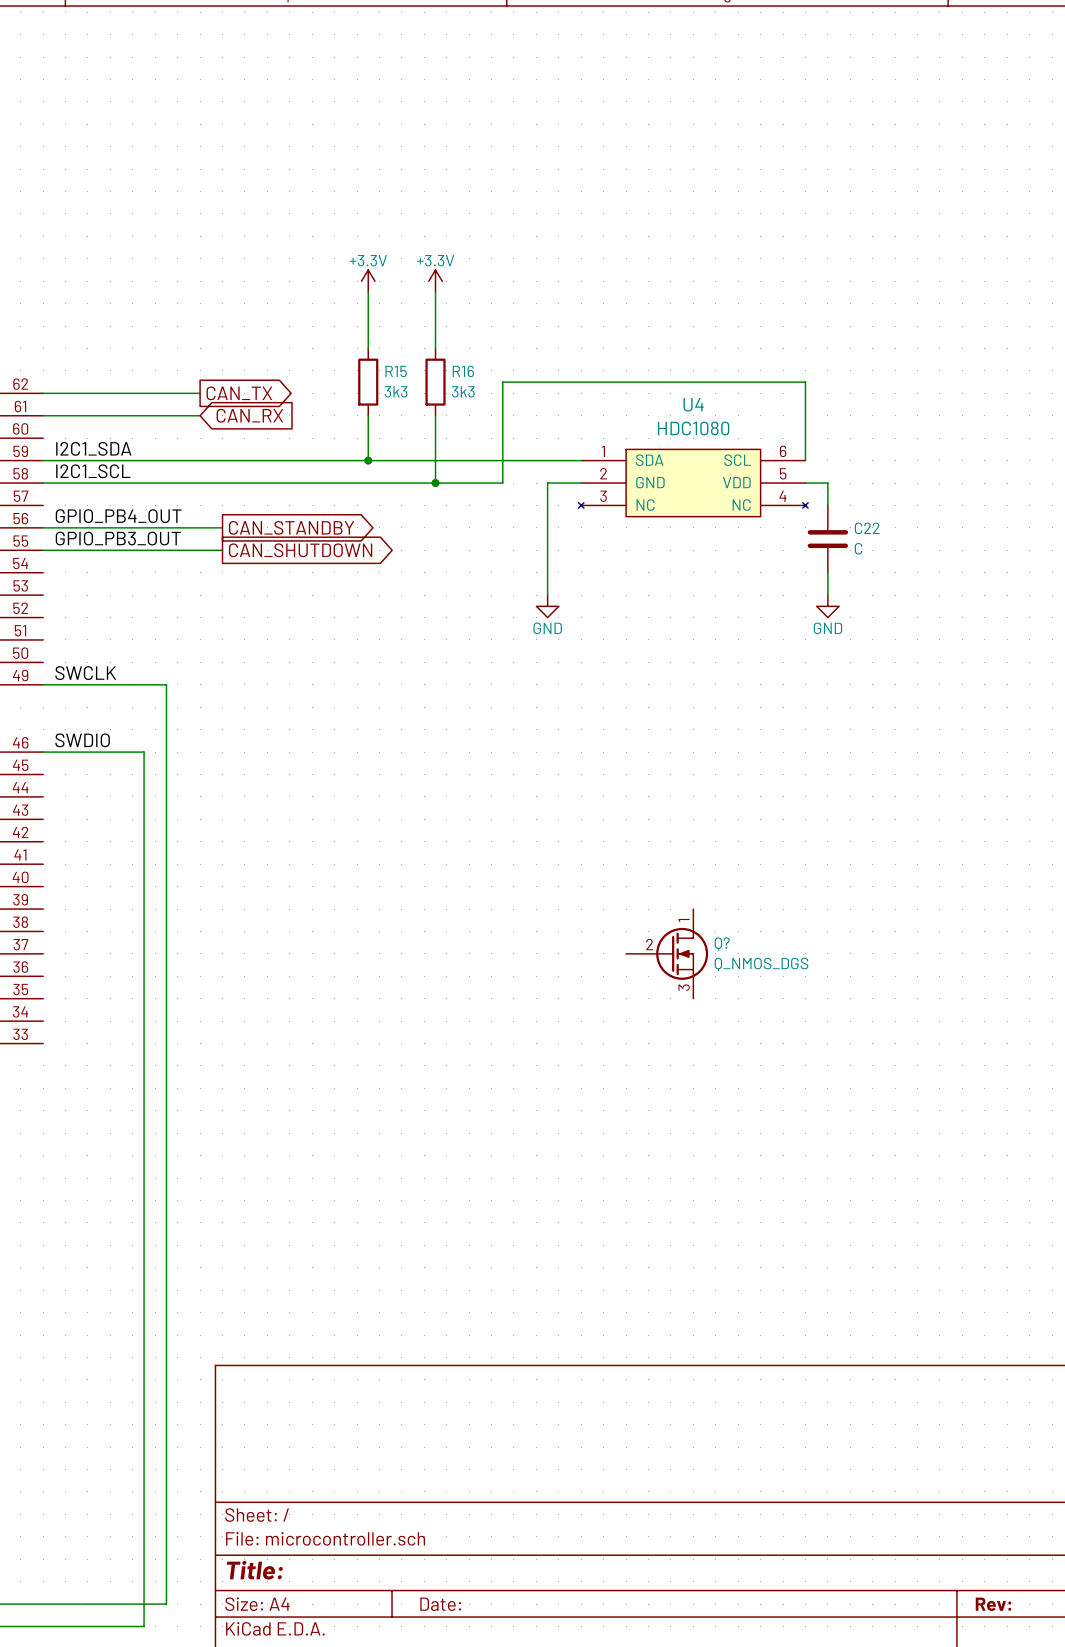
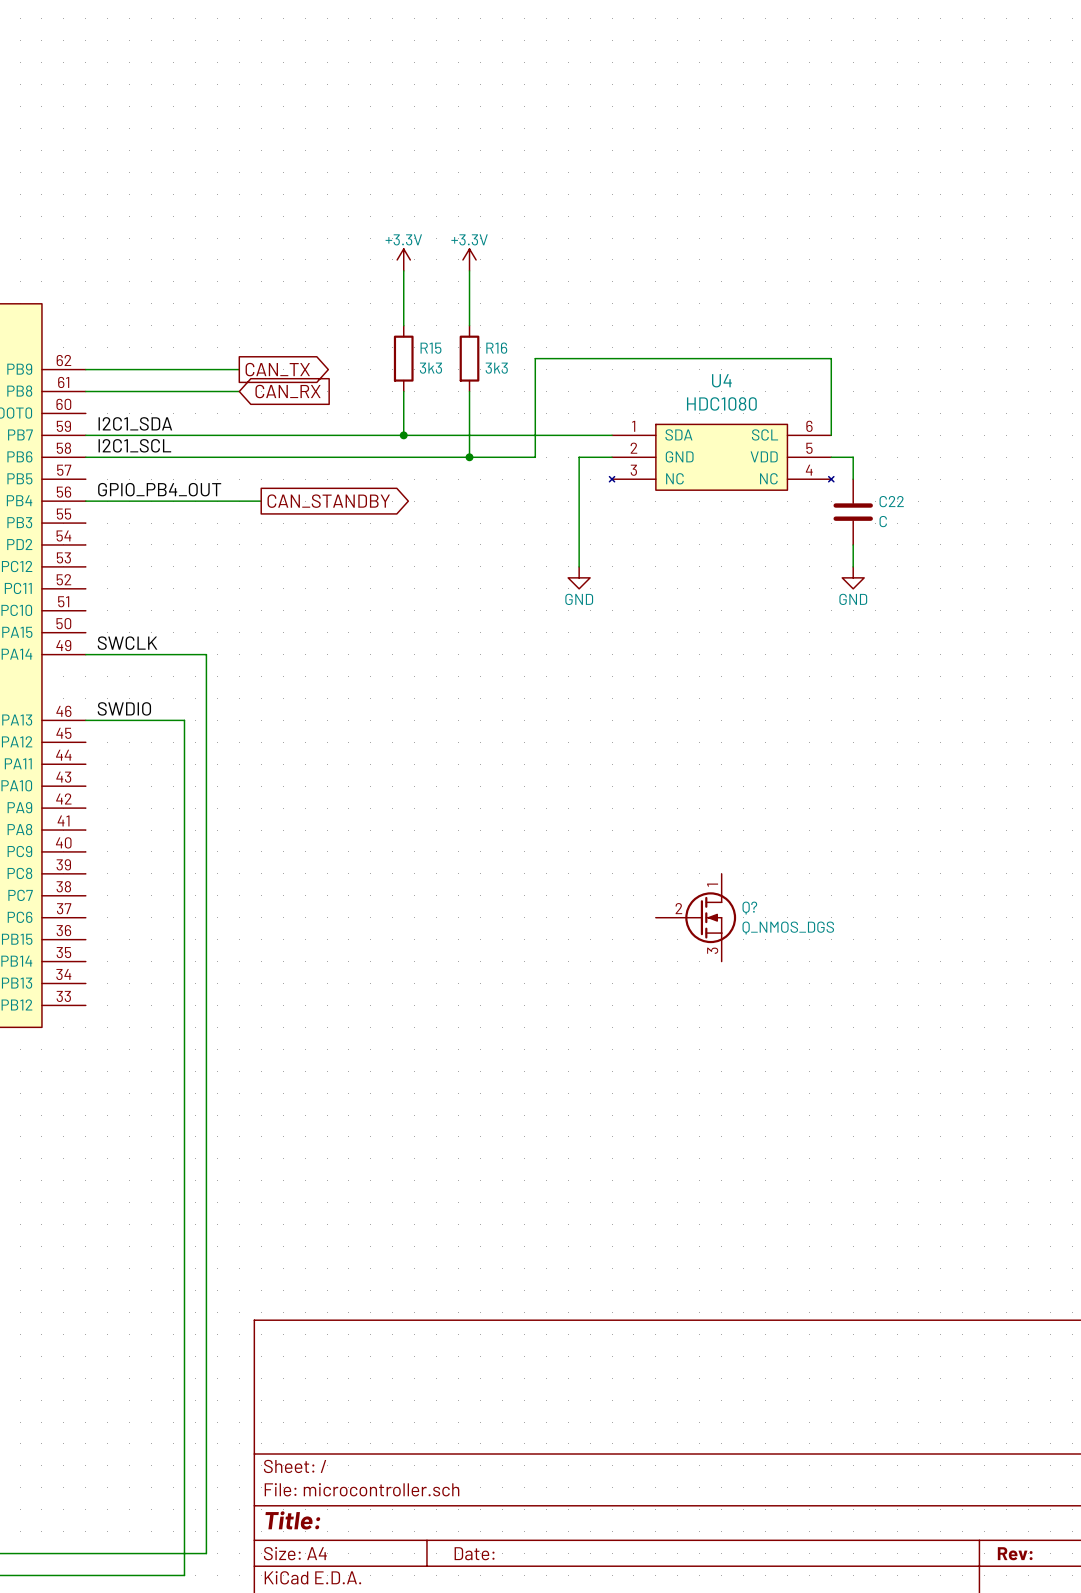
label: GPIO_PB3_OUT (118, 538) -> none
wire: (43, 550) (222, 550) -> none
global label: CAN_SHUTDOWN (300, 550) -> none

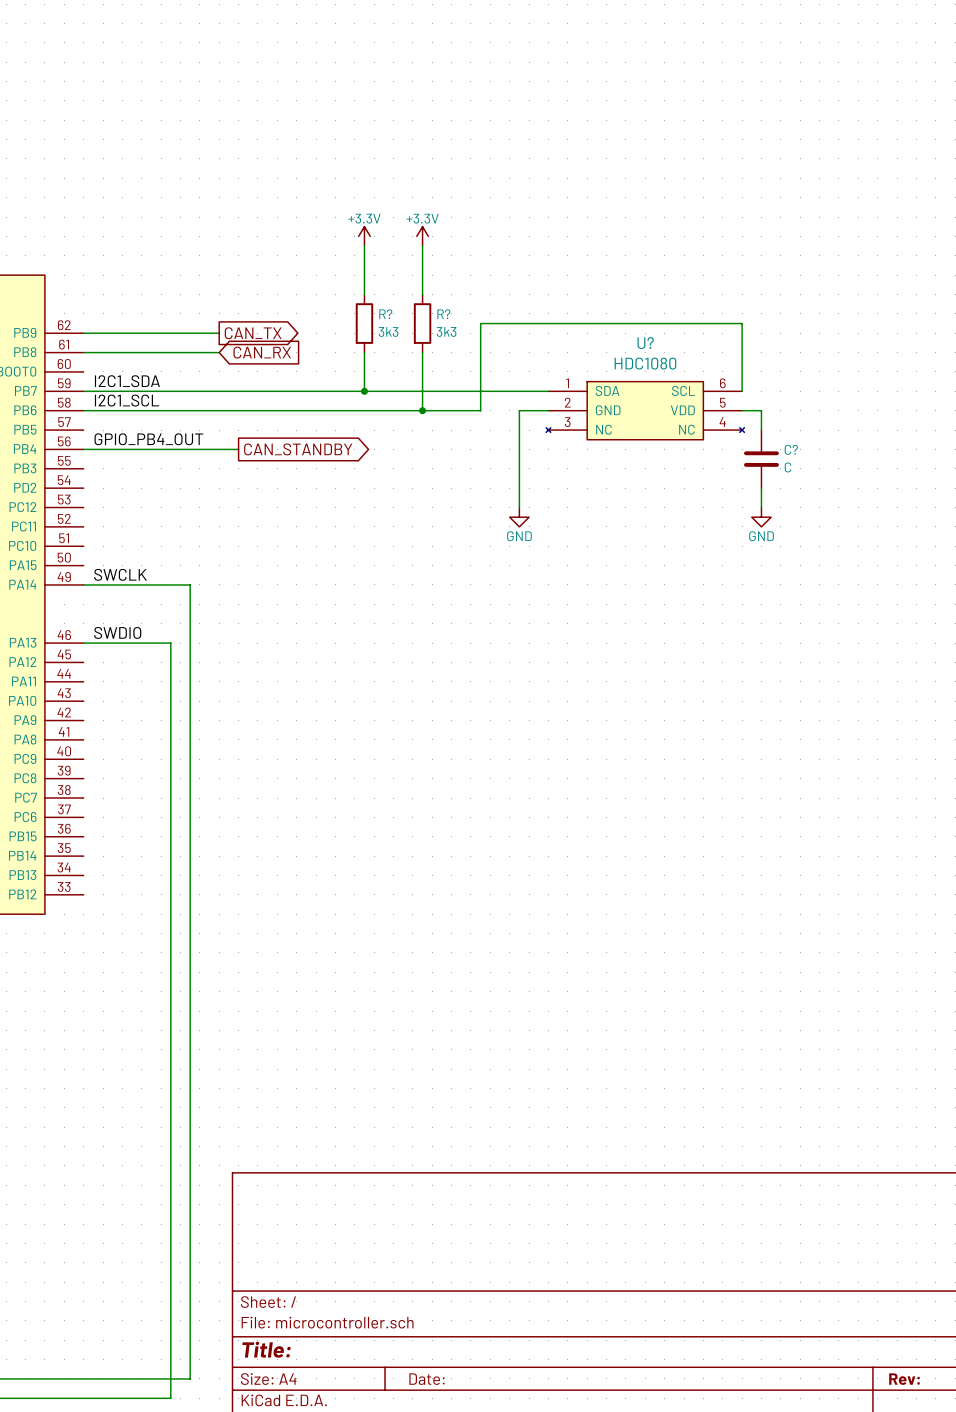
R15 name: R15 (430, 348) -> R? (385, 314)
R16 name: R16 (496, 348) -> R? (443, 314)
U4 name: U4 (721, 380) -> U? (645, 343)
C22 name: C22 (891, 501) -> C? (791, 449)
Q?: Q_NMOS_DGS (696, 917) -> none

